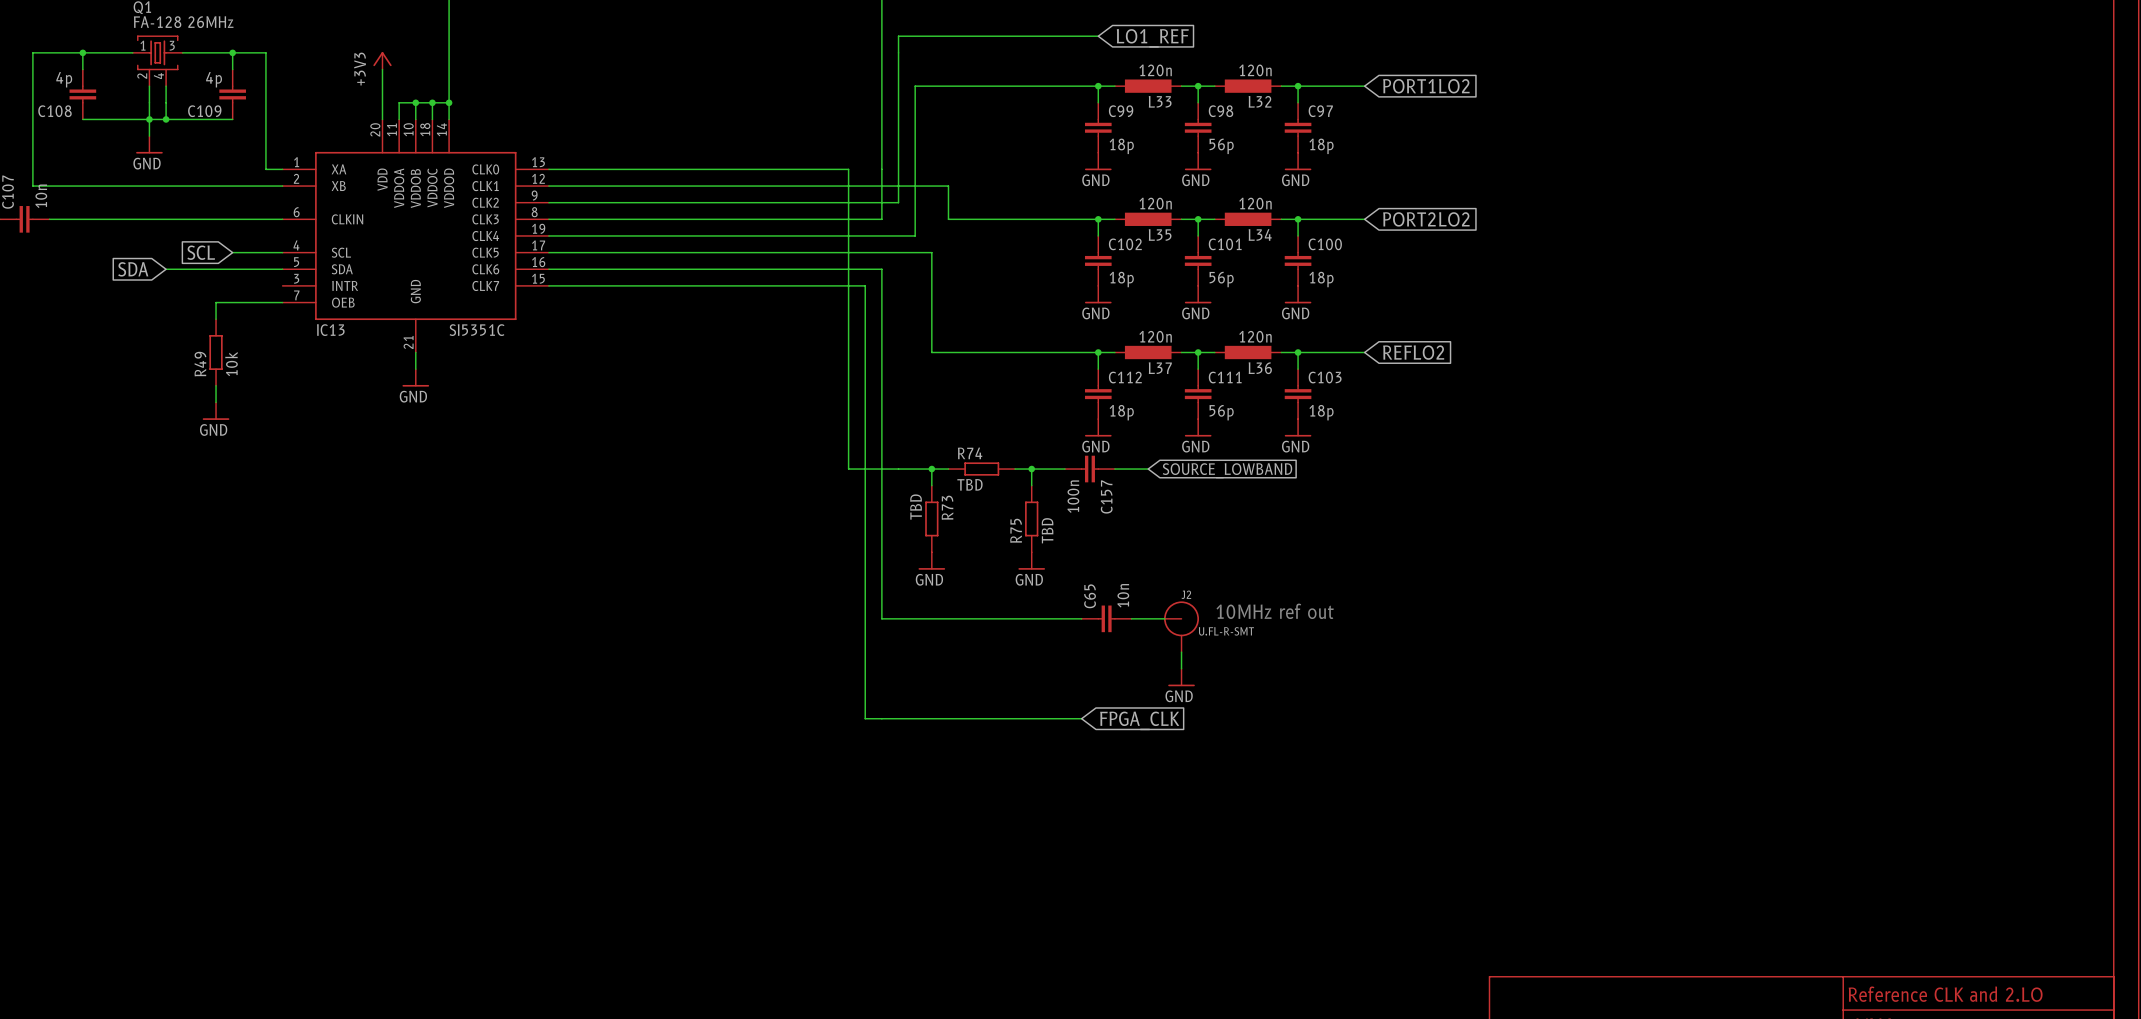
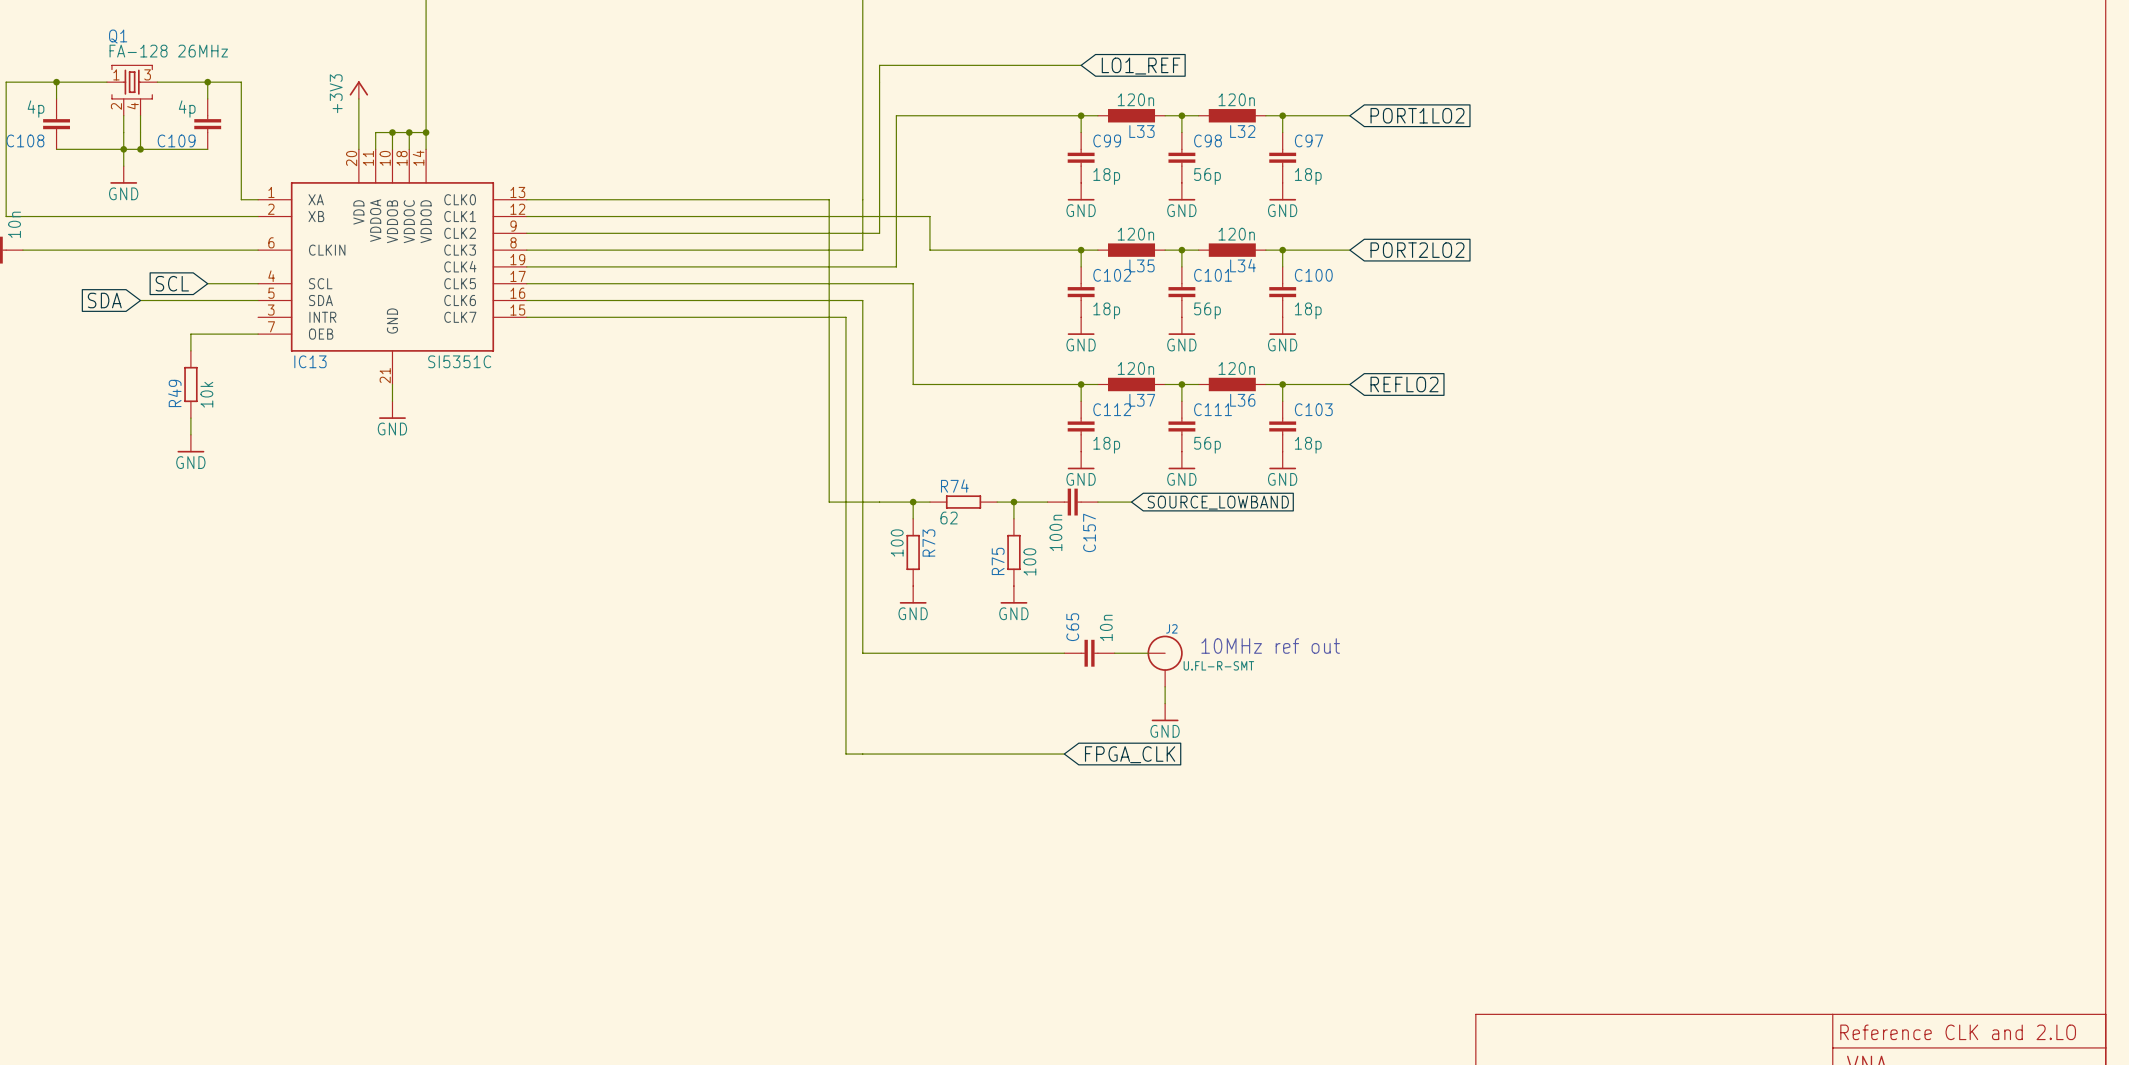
R74 value: TBD (969, 484) -> 62 (949, 518)
R73 value: TBD (916, 507) -> 100 (897, 543)
R75 value: TBD (1047, 530) -> 100 (1029, 561)

